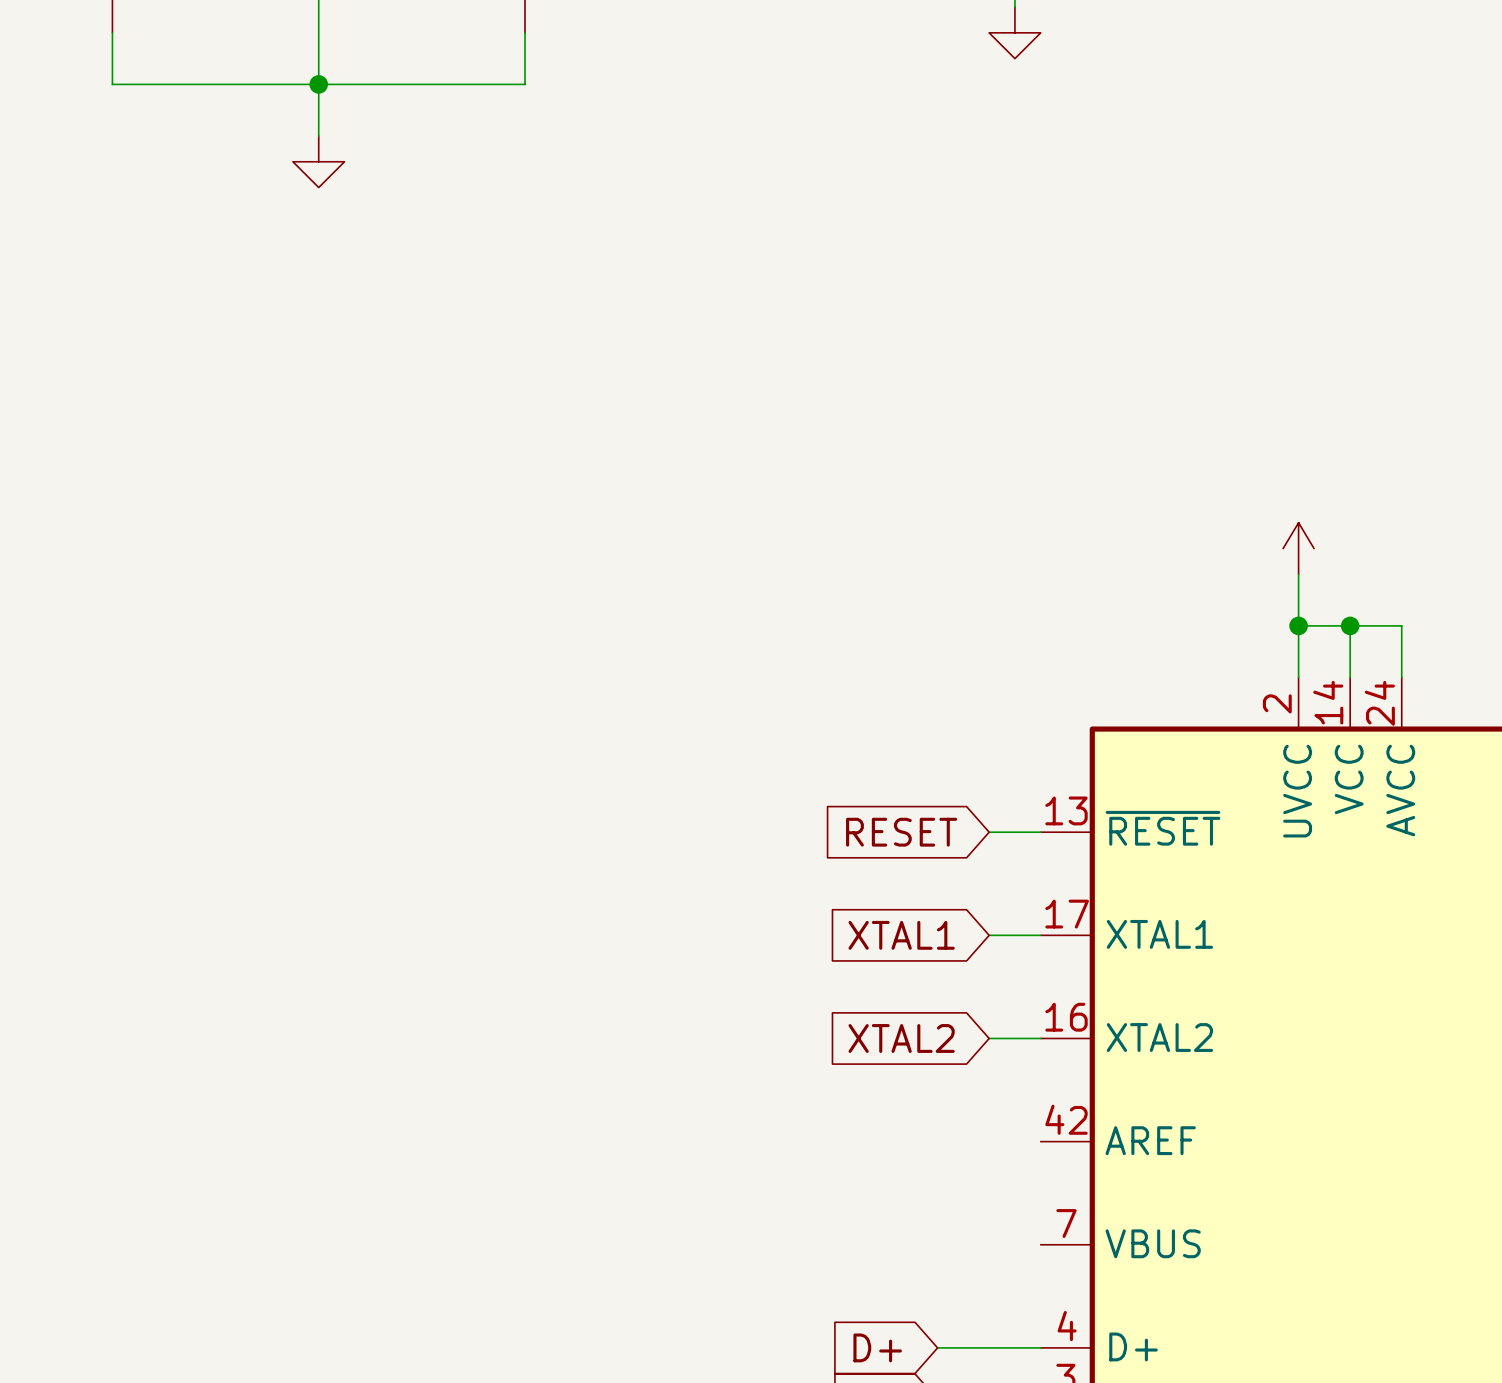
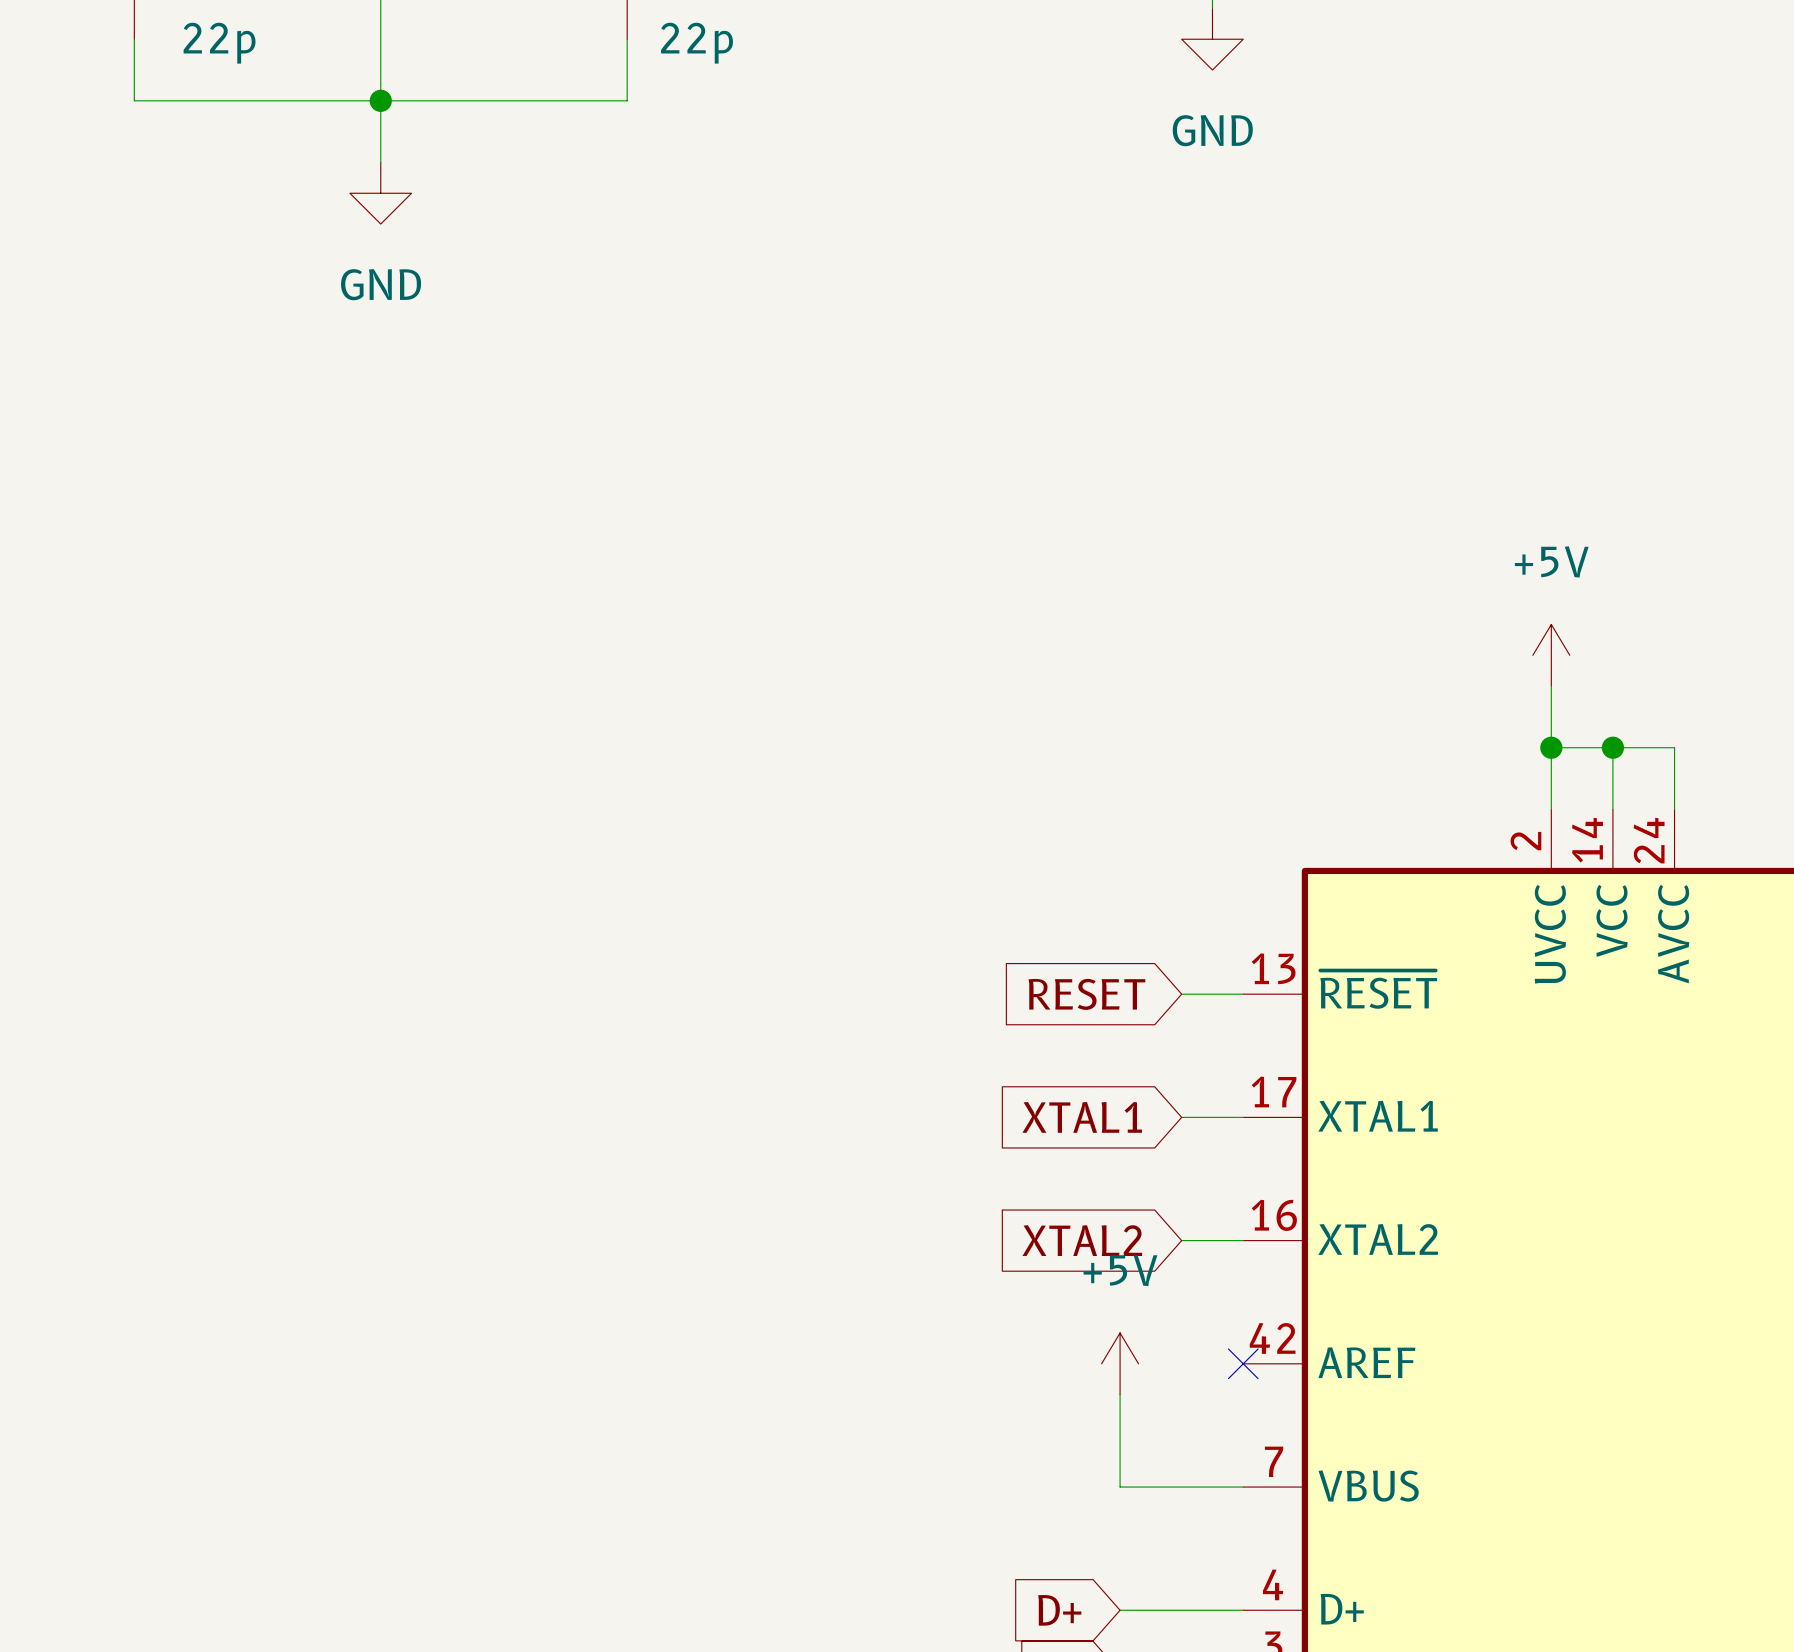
part value: none -> 22p (219, 43)
part value: none -> 22p (697, 43)
power symbol text: none -> GND (1212, 130)
power symbol text: none -> GND (381, 284)
power symbol text: none -> +5V (1551, 561)
power symbol: none -> +5V (1120, 1363)
no-connect mark: none -> (1243, 1363)
wire: none -> (1120, 1394) (1120, 1487) (1243, 1487)

